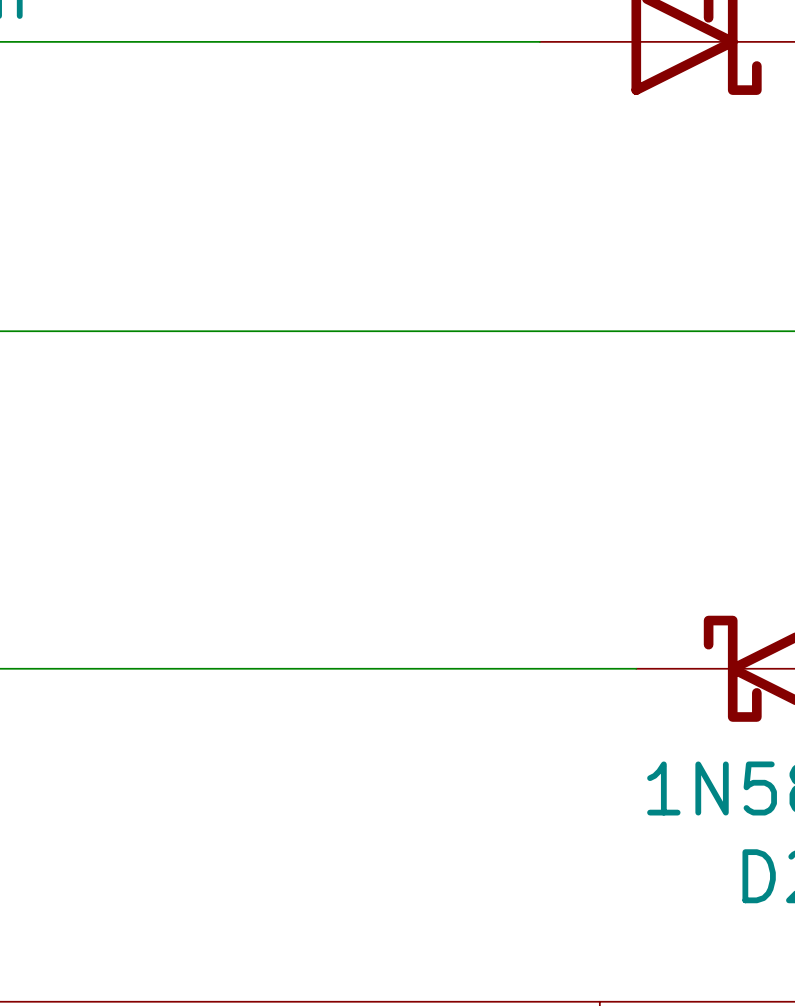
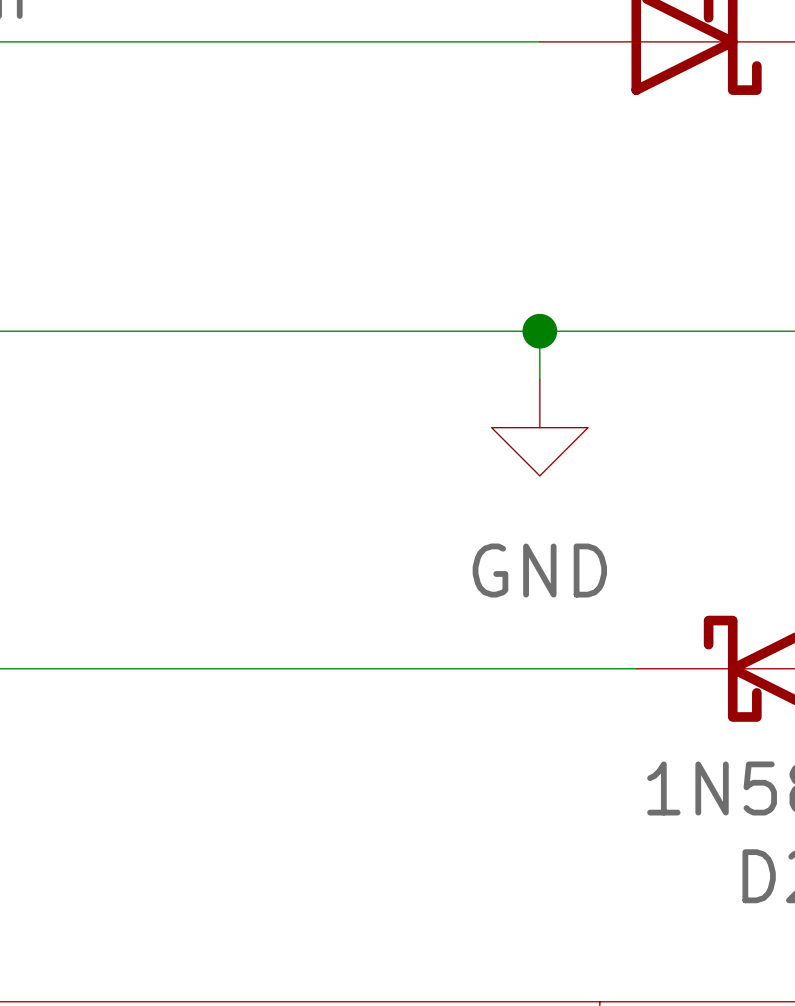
wire: none -> (539, 331) (539, 379)
junction: none -> (539, 331)
power symbol: none -> GND (539, 427)

